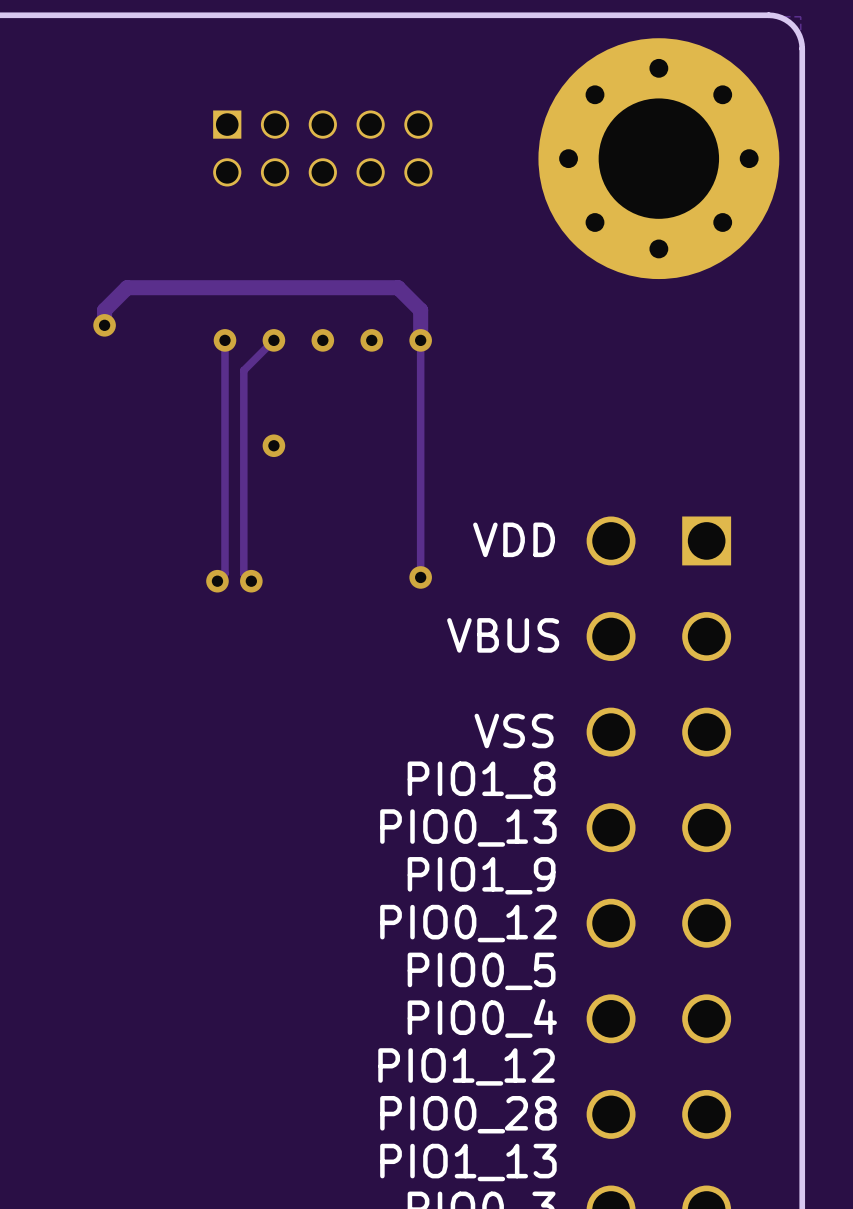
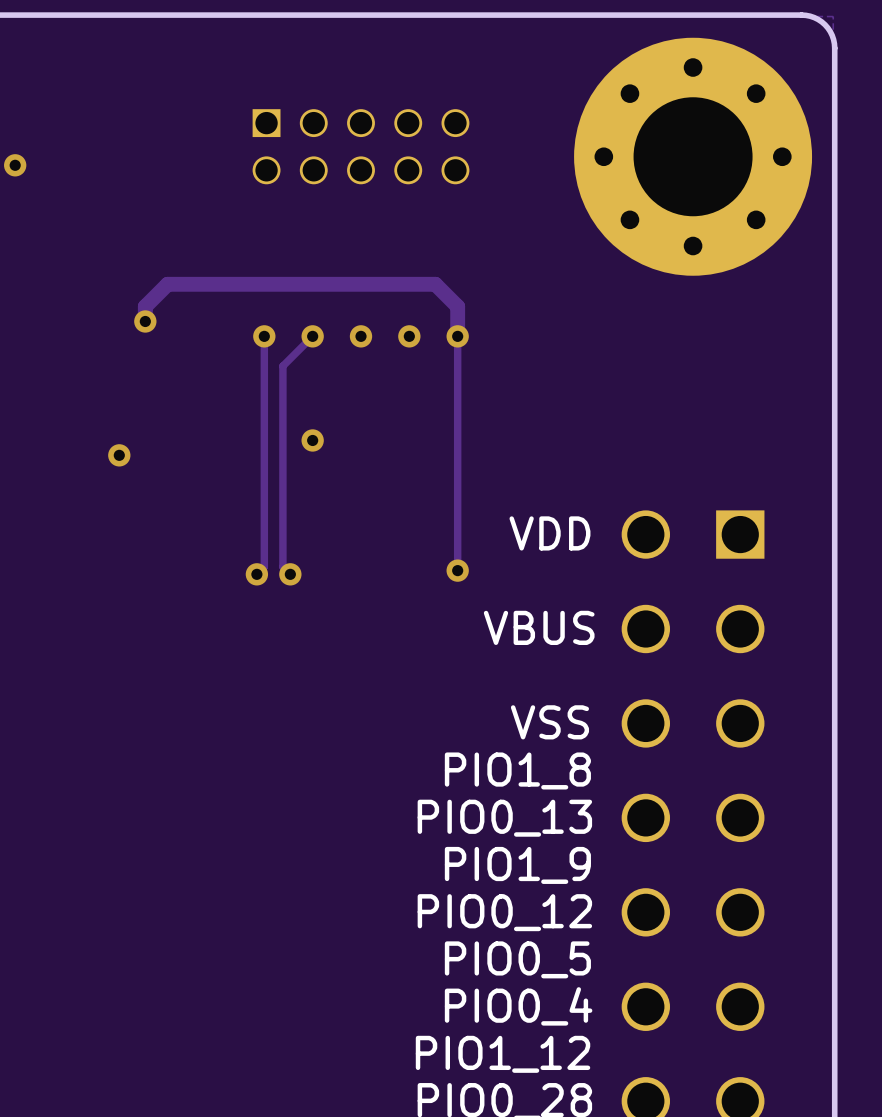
via: none -> (119, 455)

